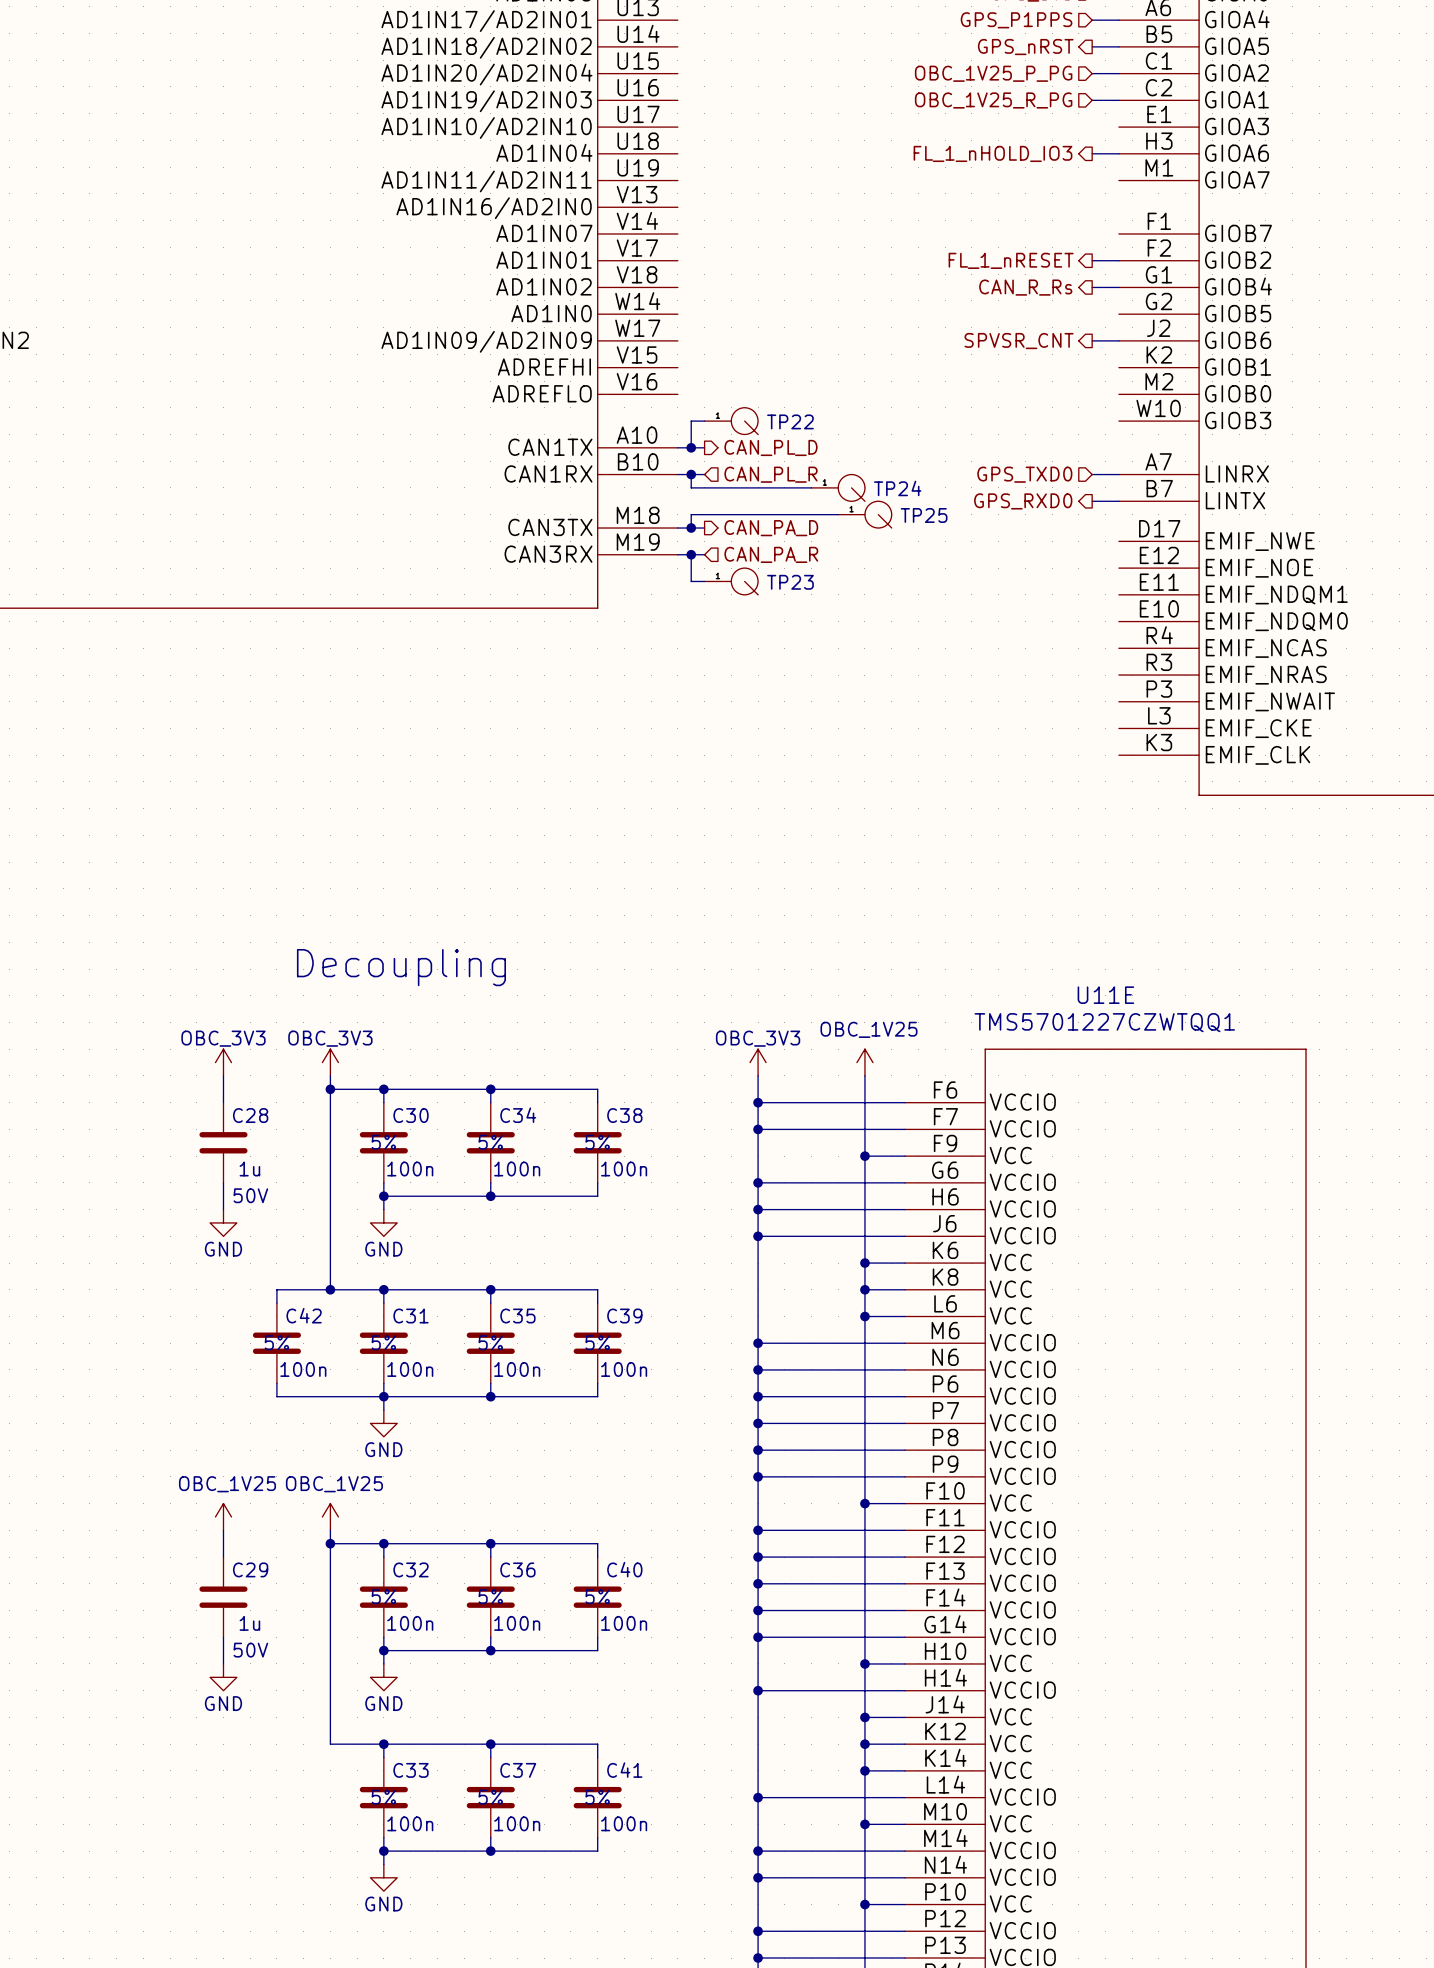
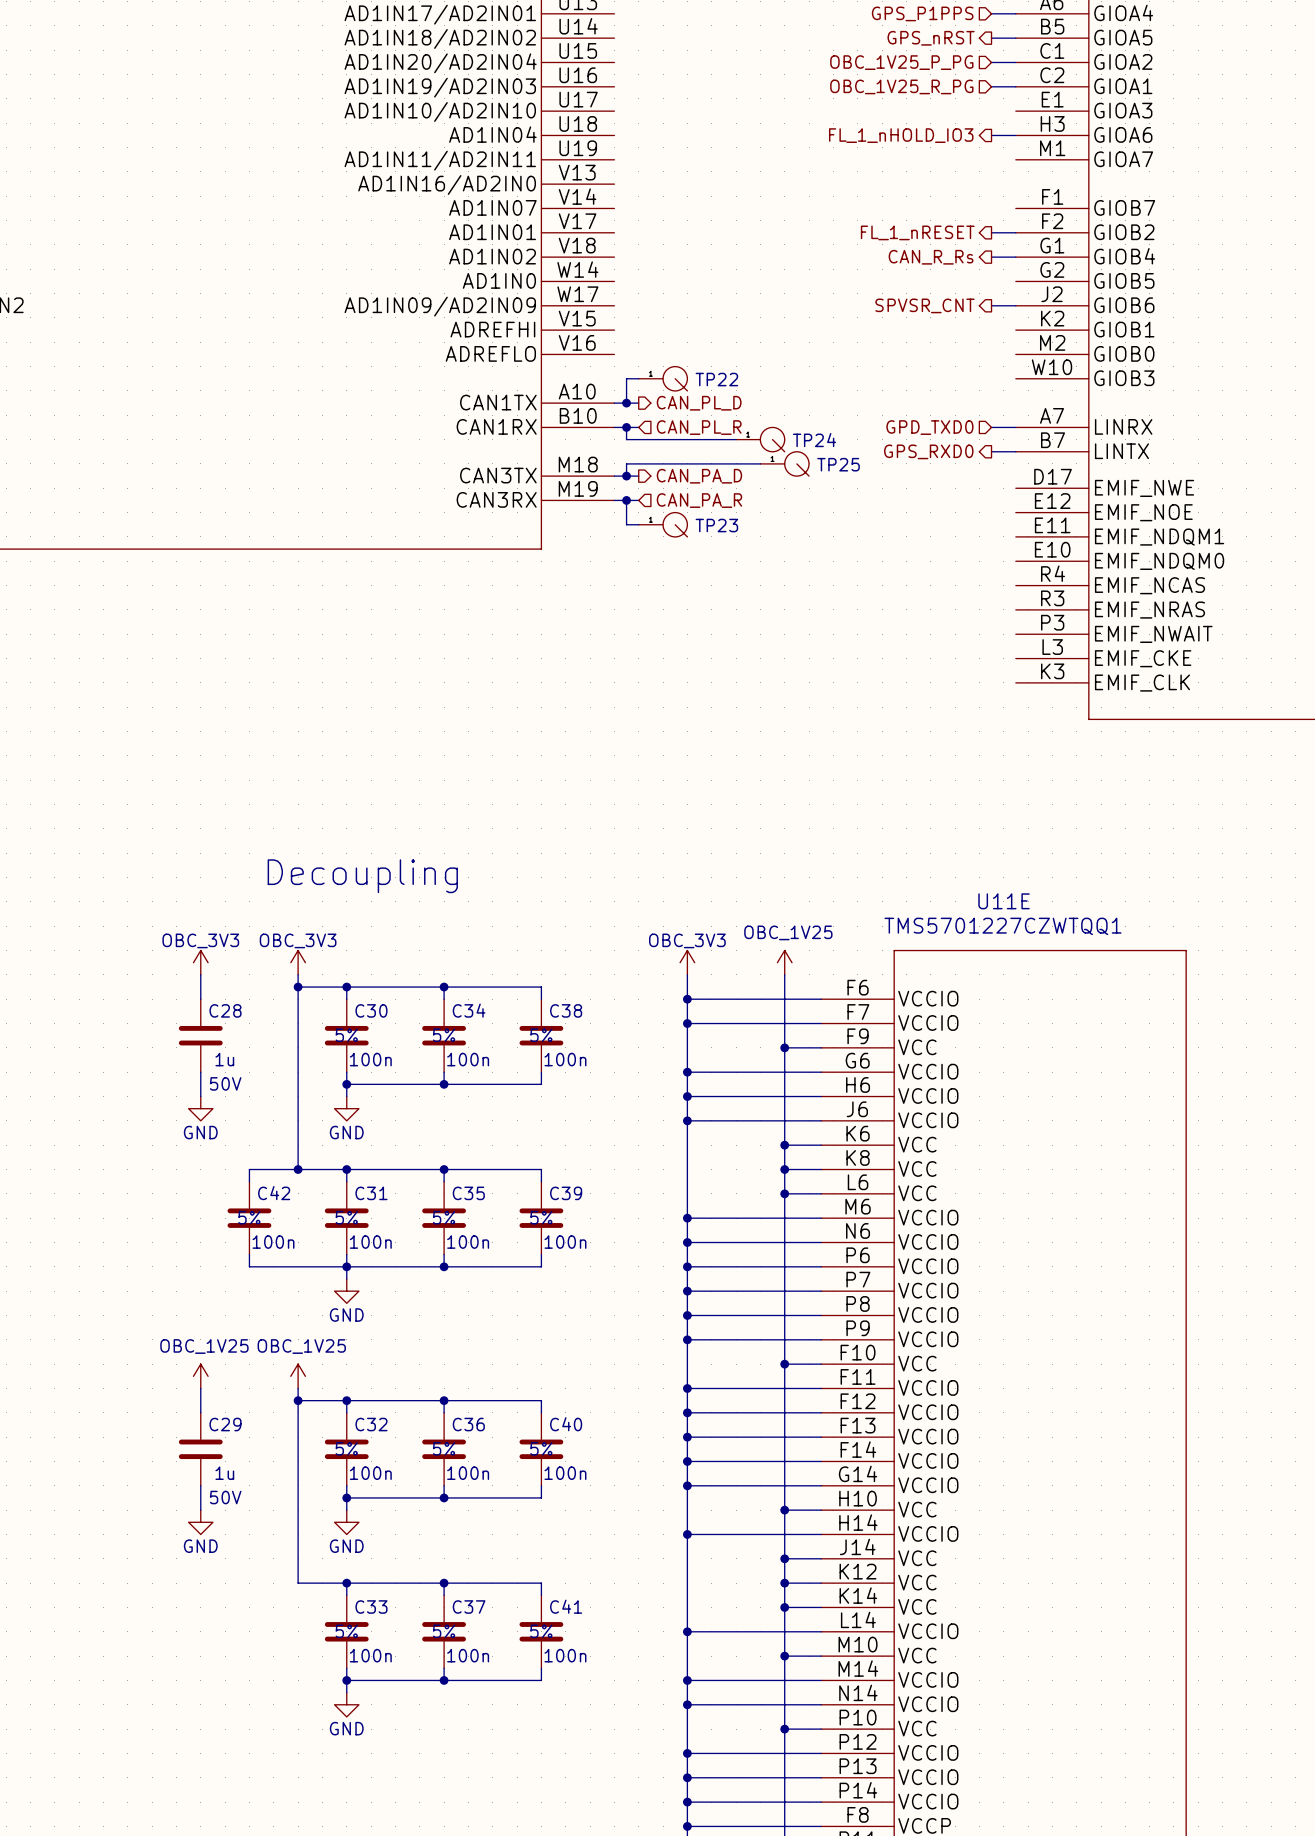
hierarchical label: GPS_TXD0 (1024, 474) -> GPD_TXD0 (929, 427)

